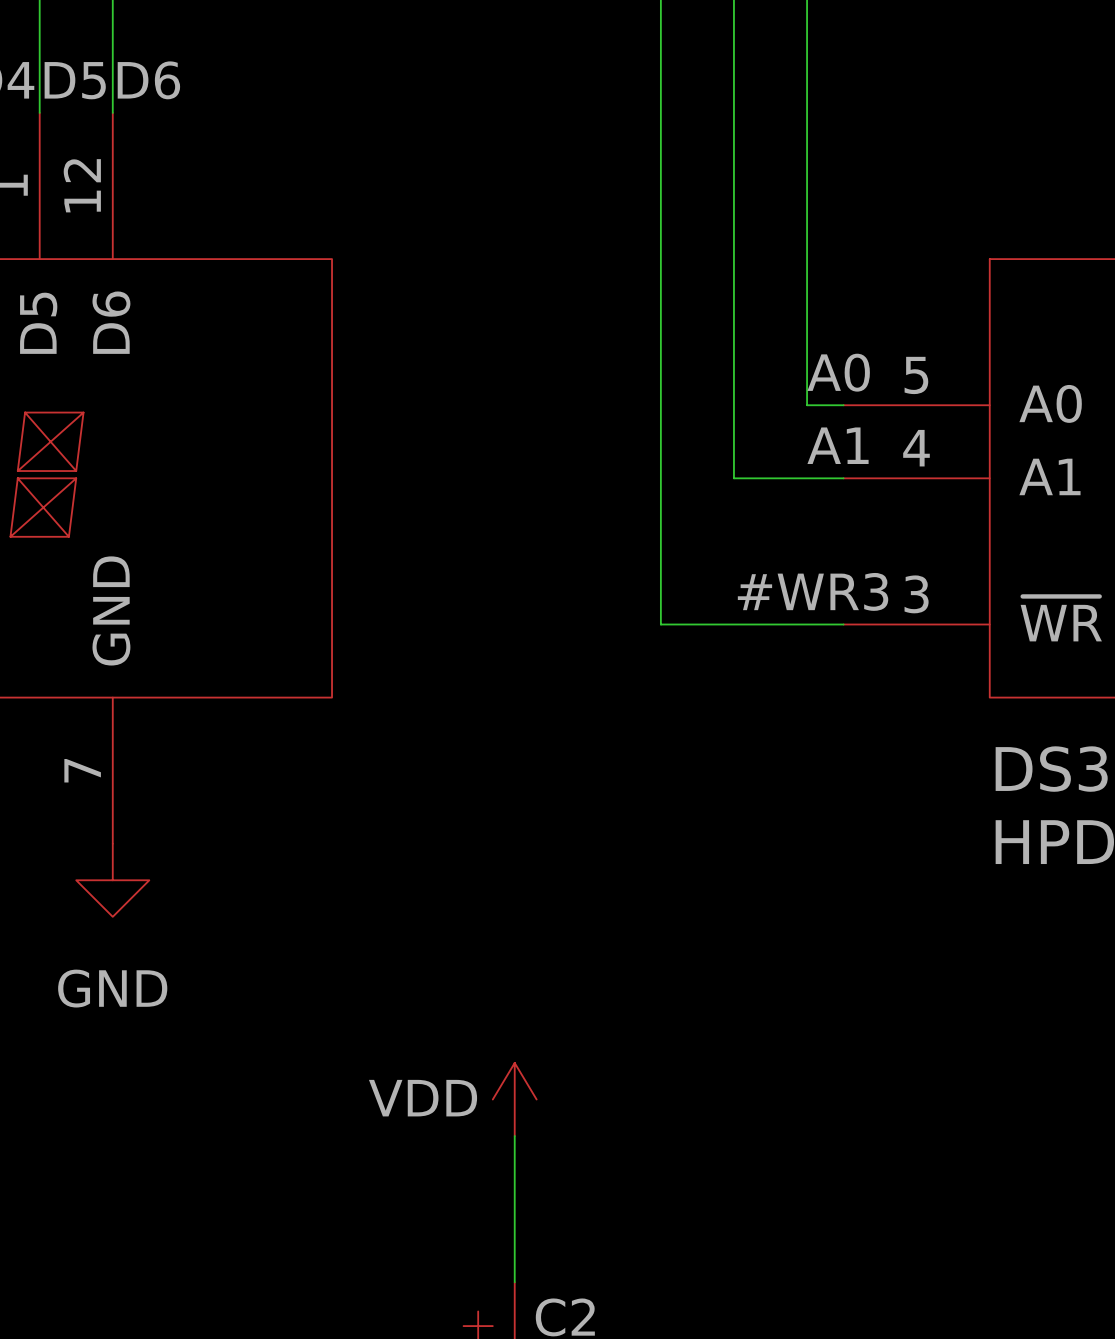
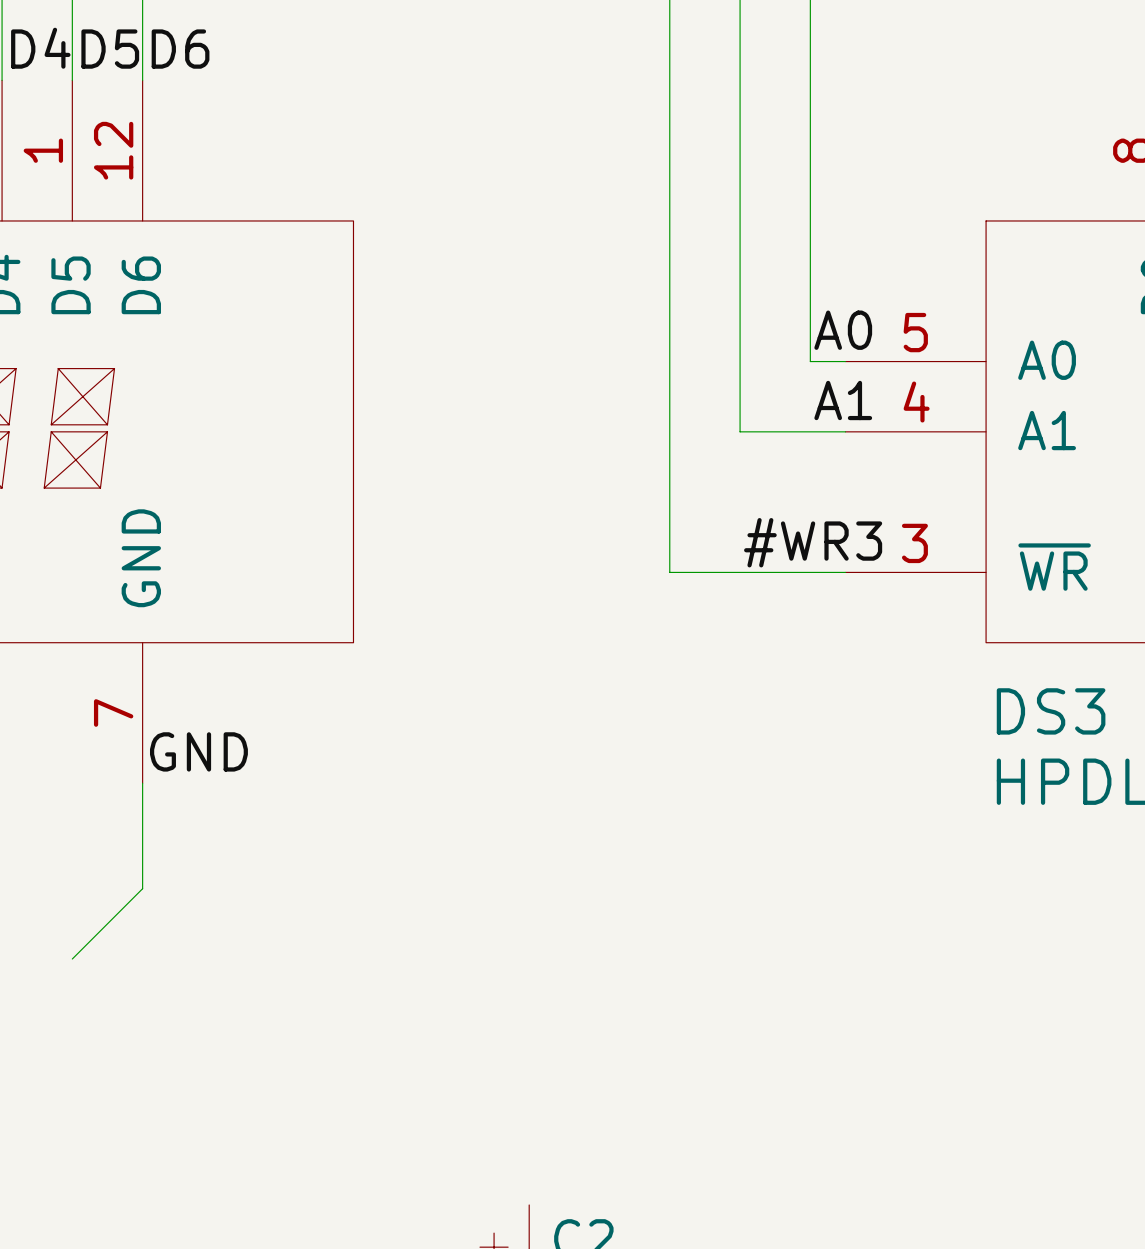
label: none -> GND (198, 751)
wire: none -> (142, 783) (142, 888) (72, 958)
power symbol: GND (112, 880) -> none
power symbol: VDD (514, 1099) -> none
wire: (514, 1136) (514, 1282) -> none

